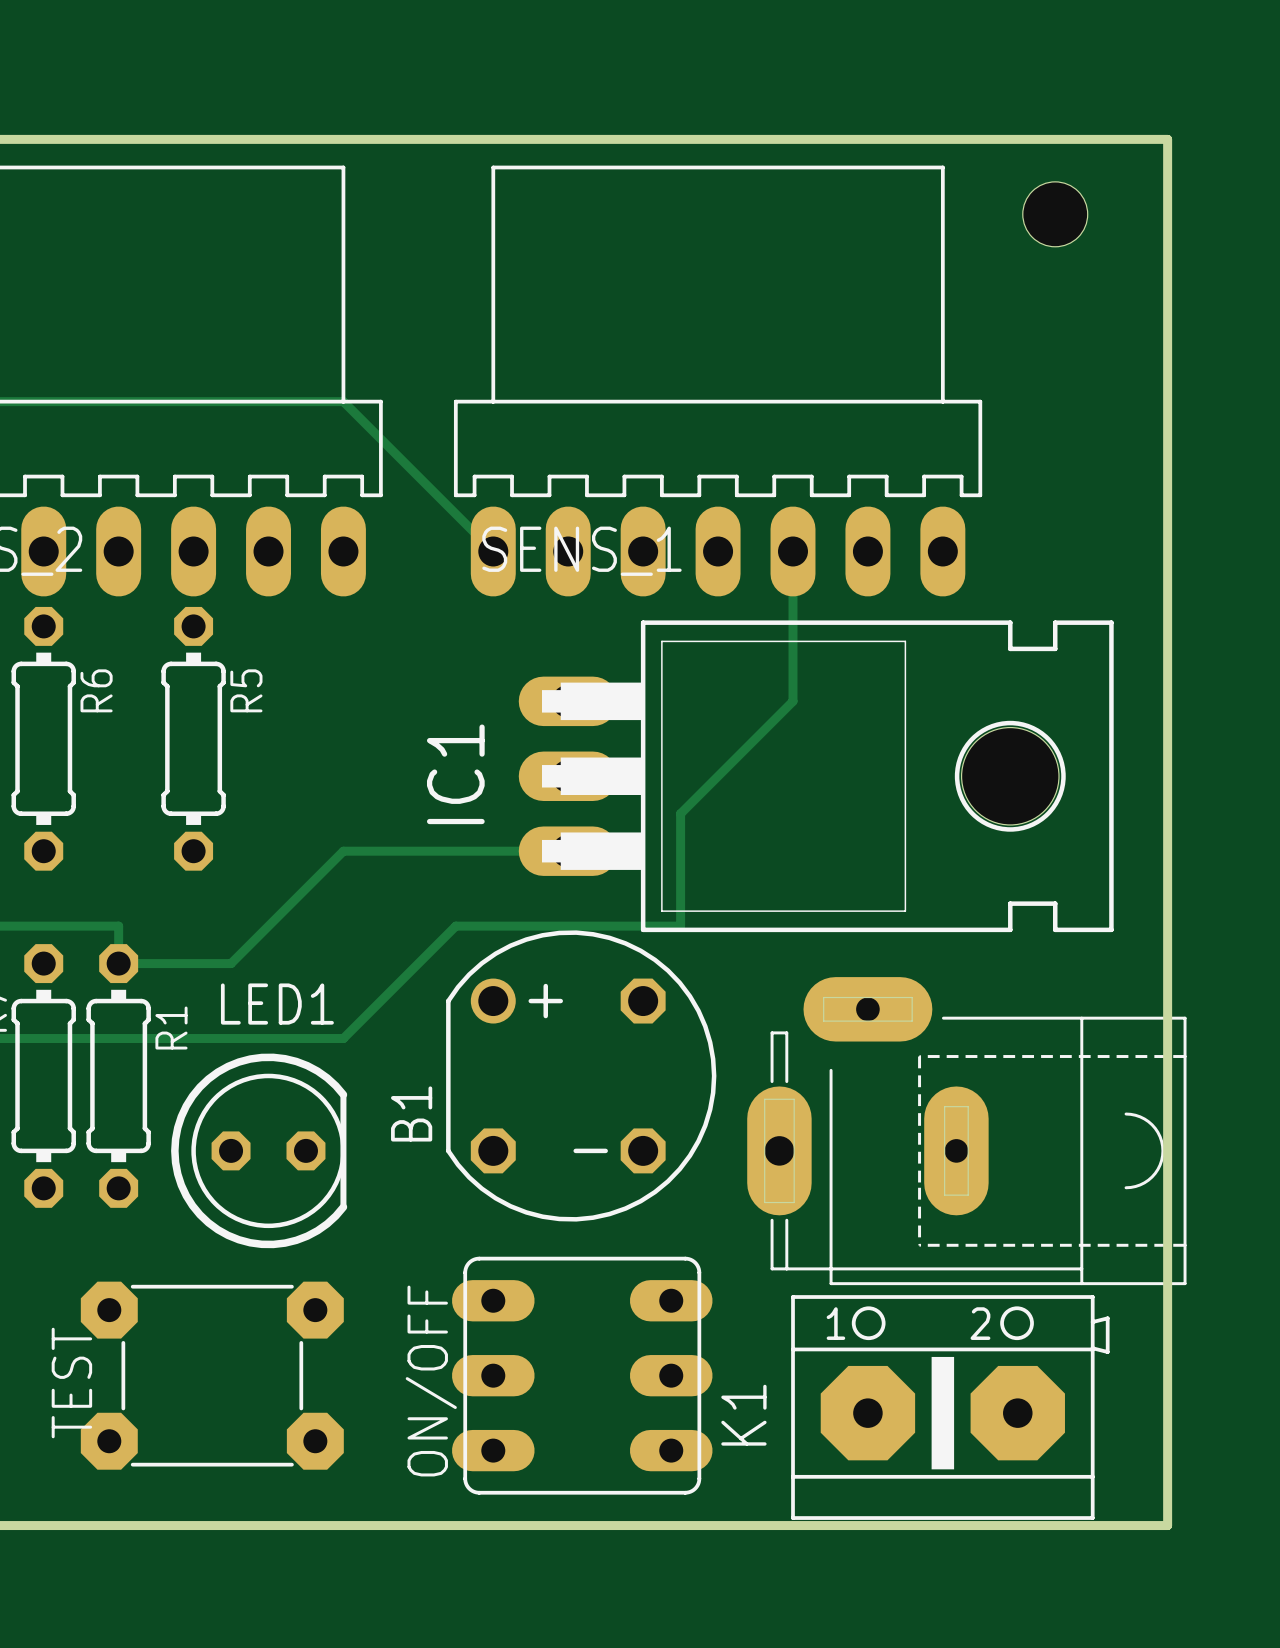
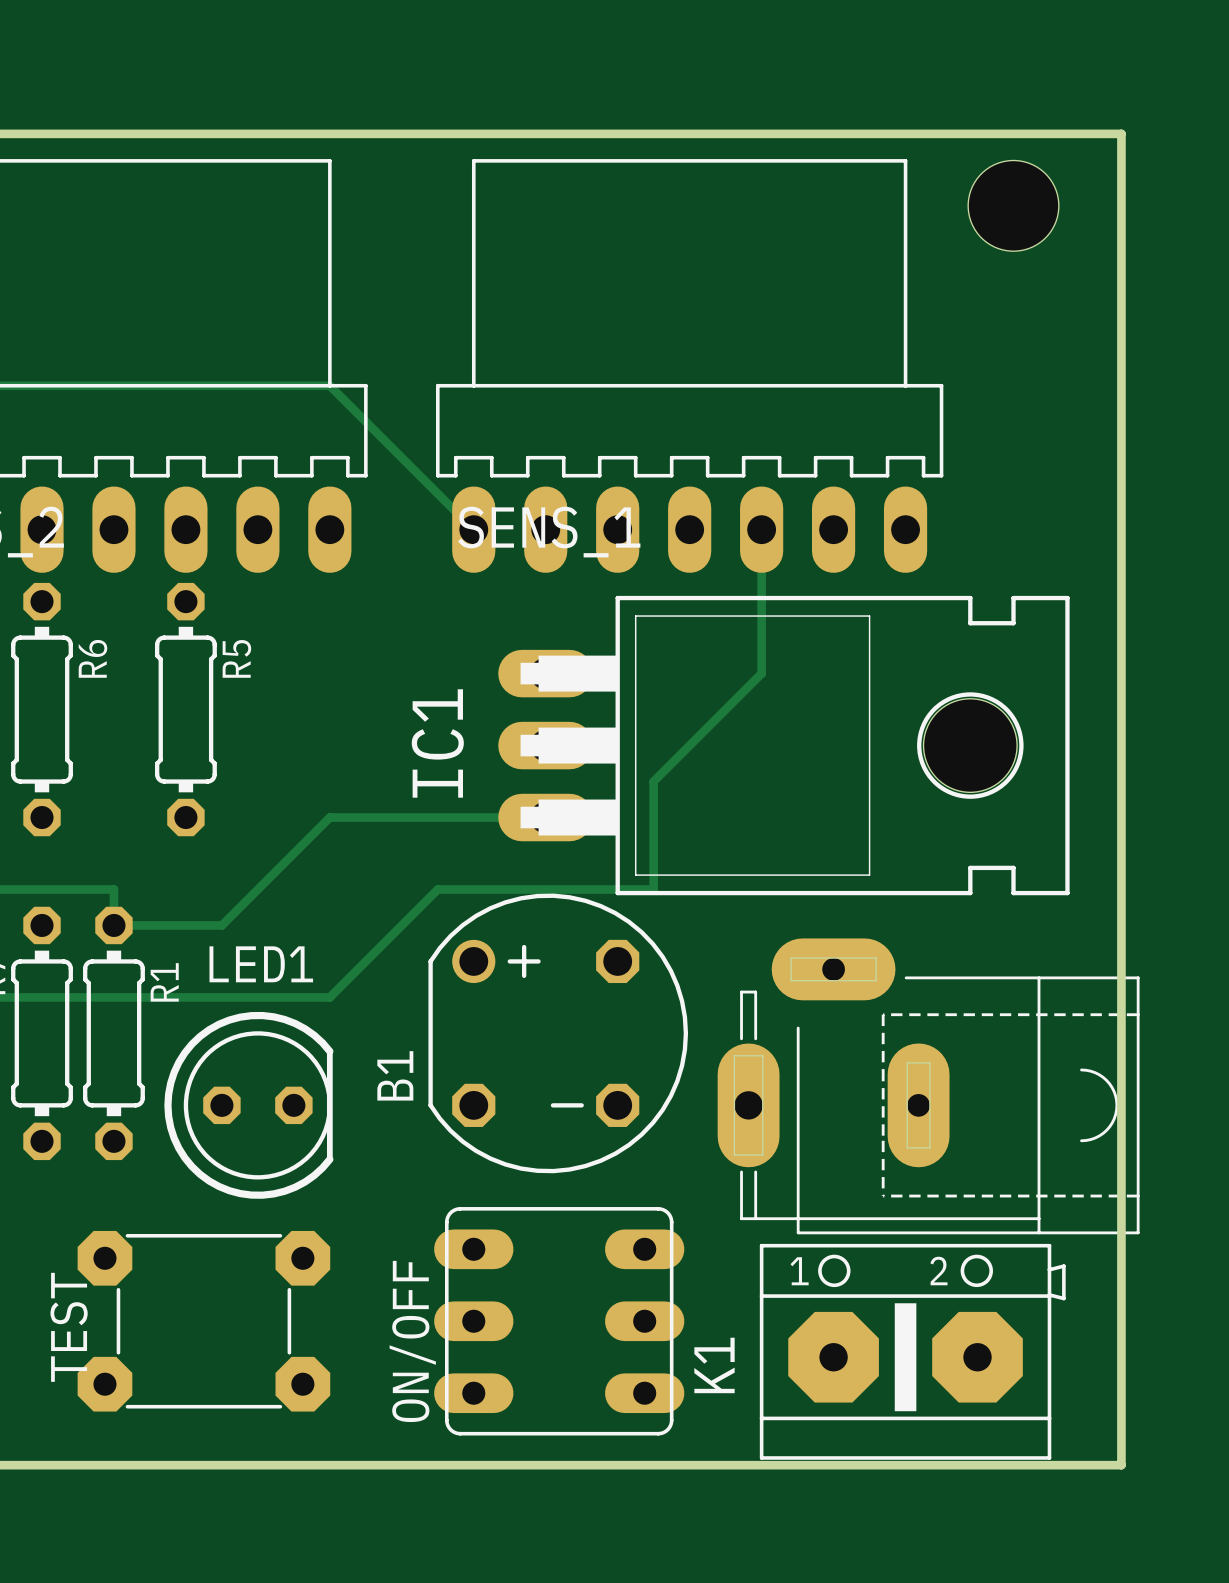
hole size: [1022, 181, 1088, 247] -> [968, 160, 1059, 252]

